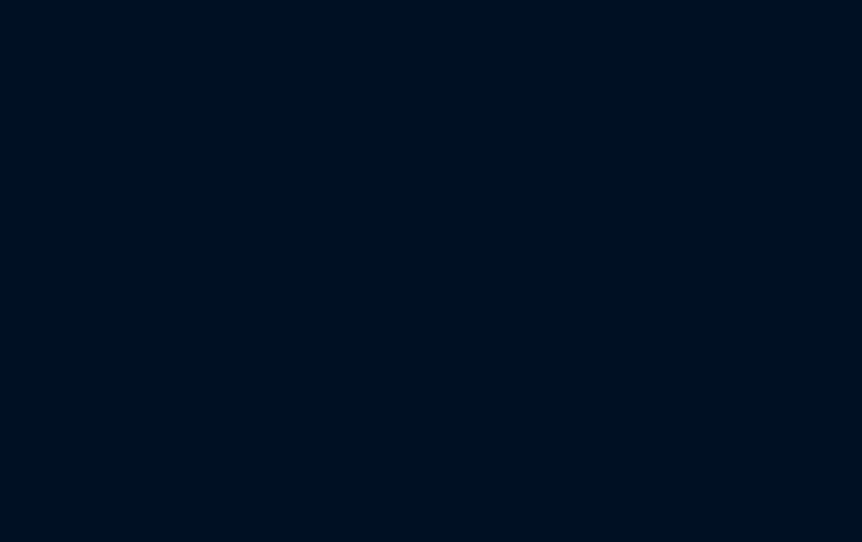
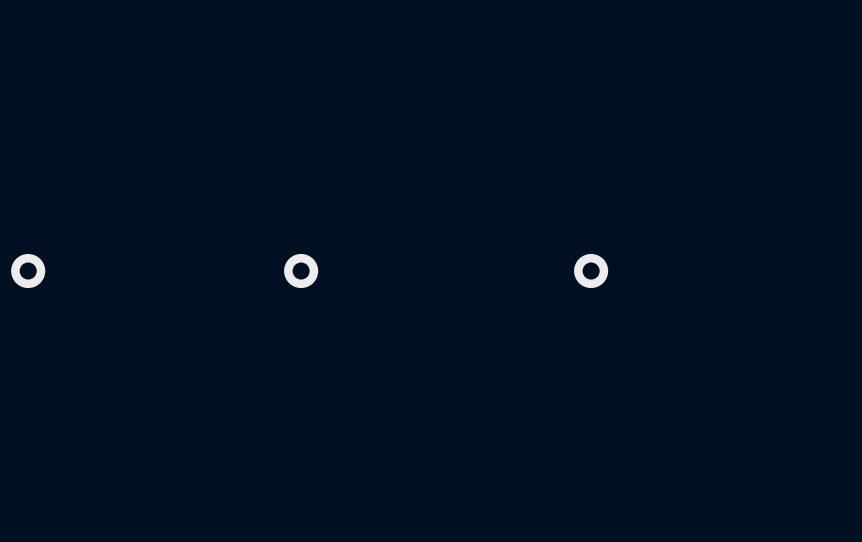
via: none -> (28, 271)
via: none -> (301, 271)
via: none -> (591, 271)

